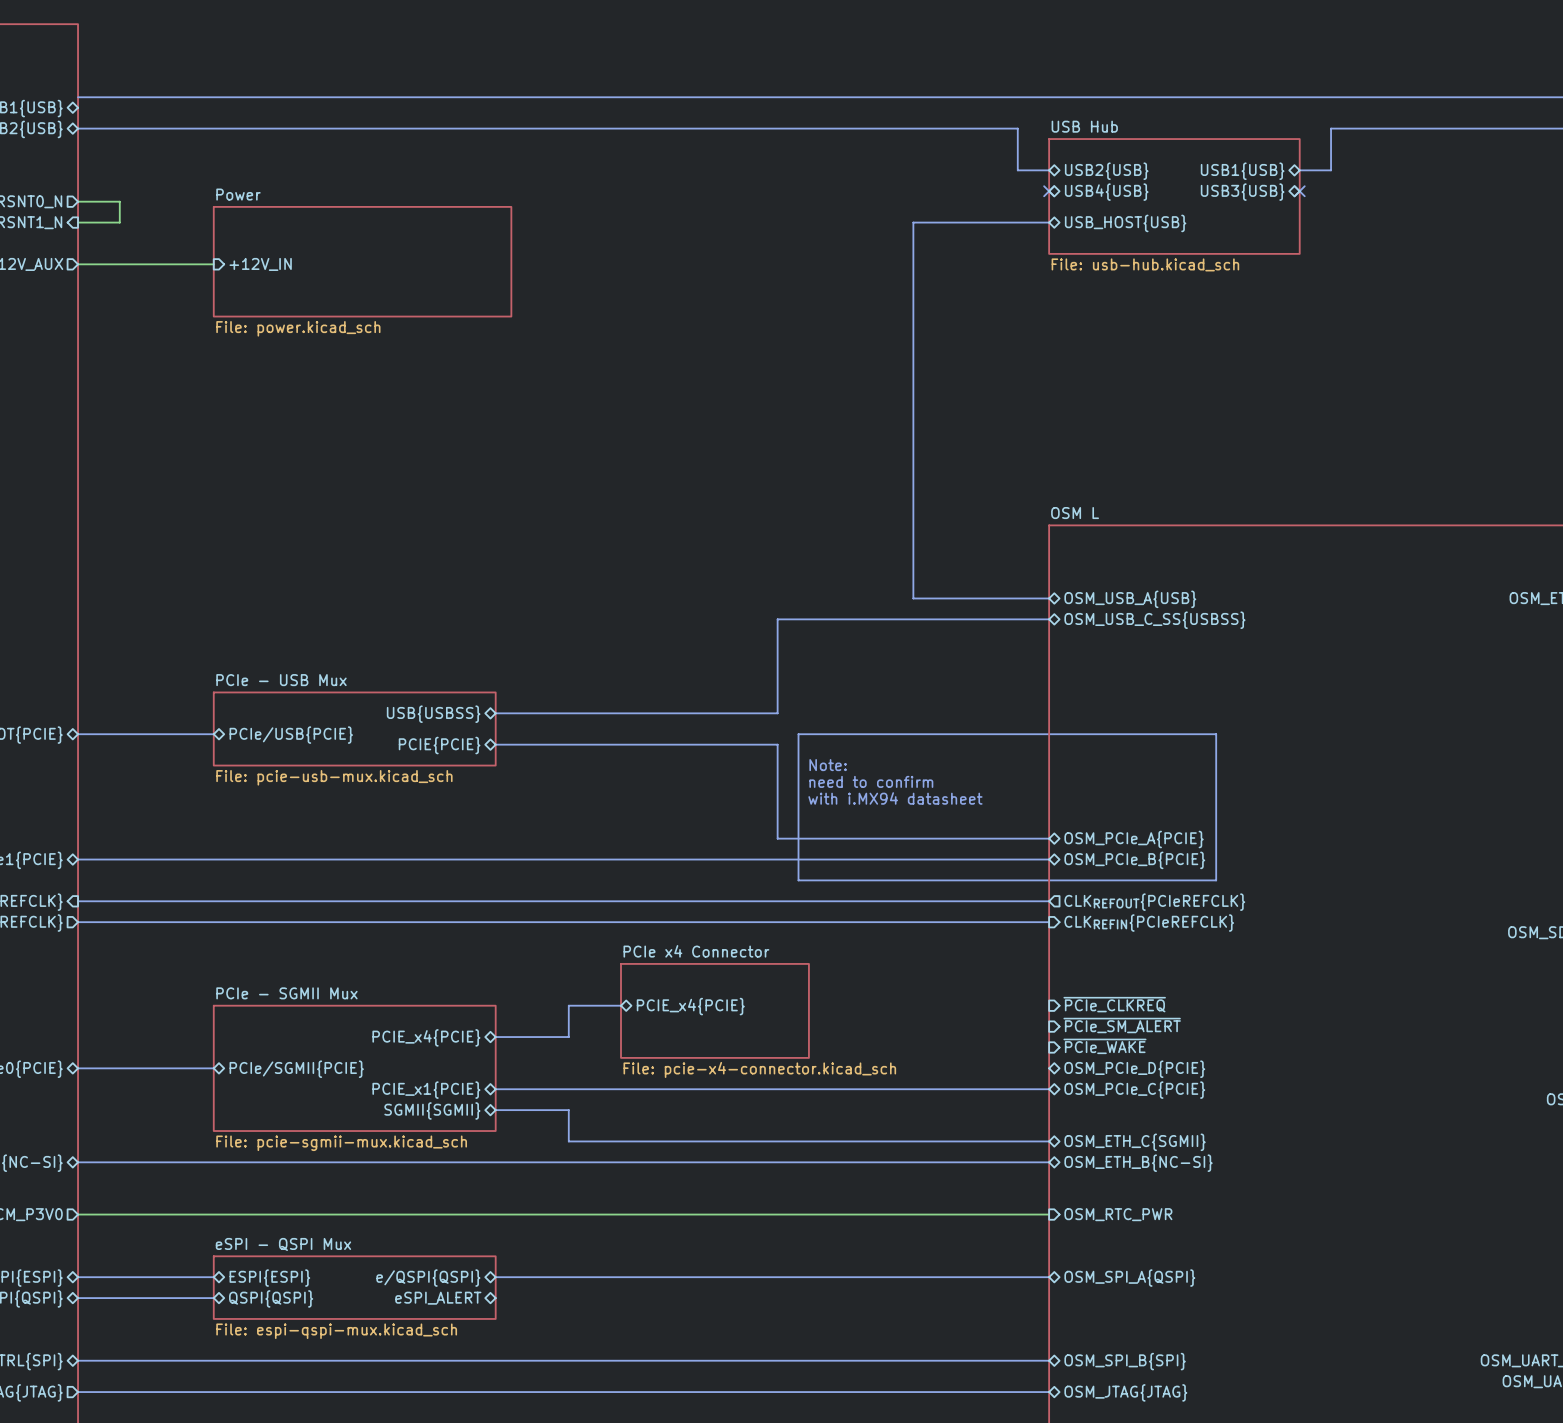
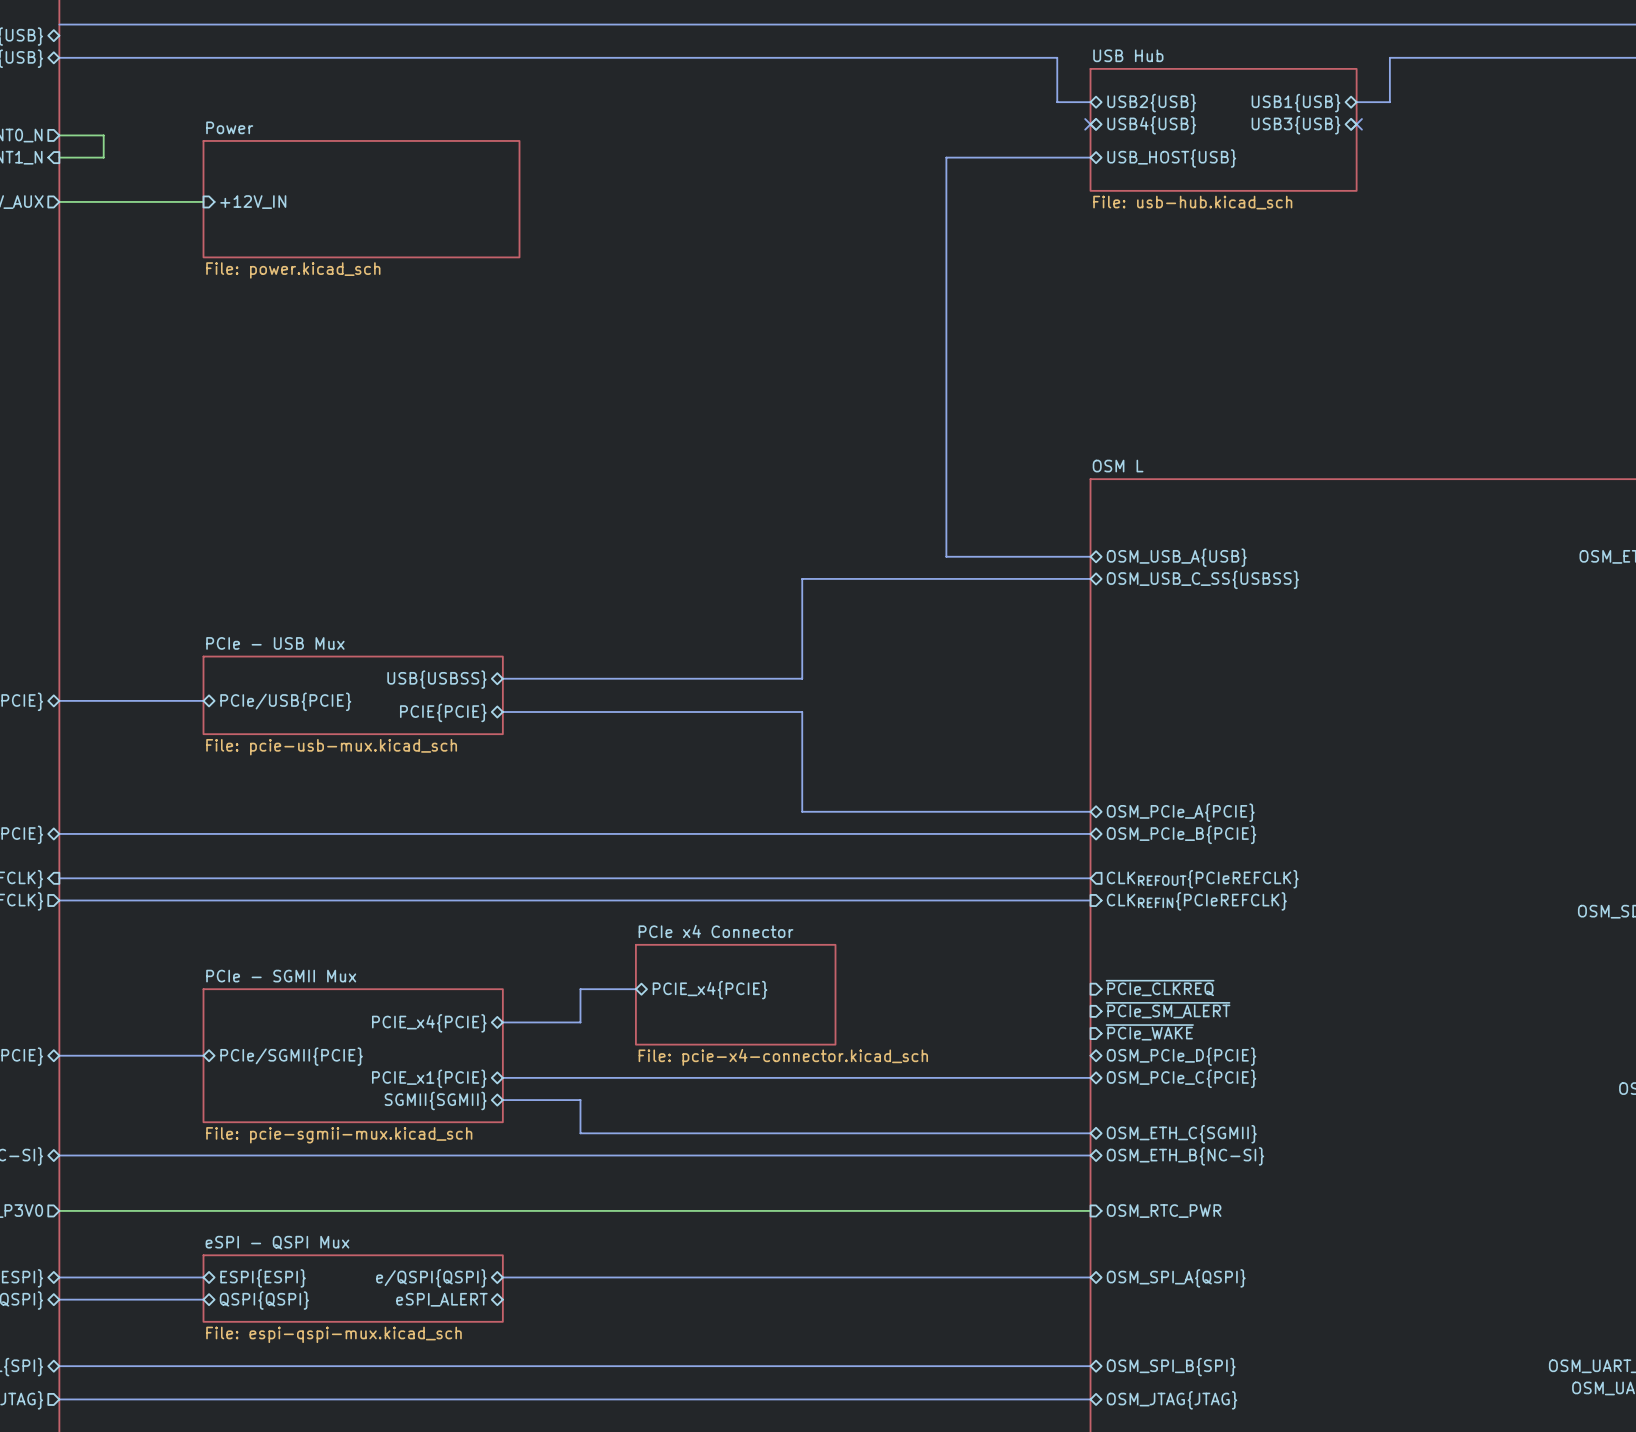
line: (798, 734) (1216, 734) (1216, 880) (798, 880) (798, 734) -> none
text: Note: (828, 765) -> none
text: need to confirm (871, 781) -> none
text: with i.MX94 datasheet (895, 798) -> none

